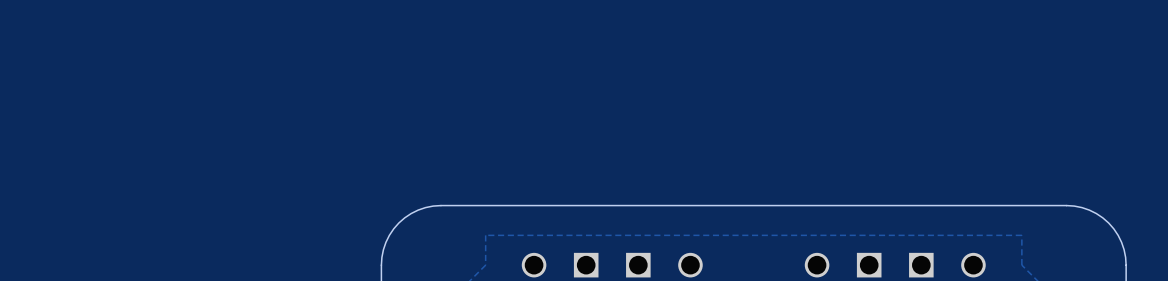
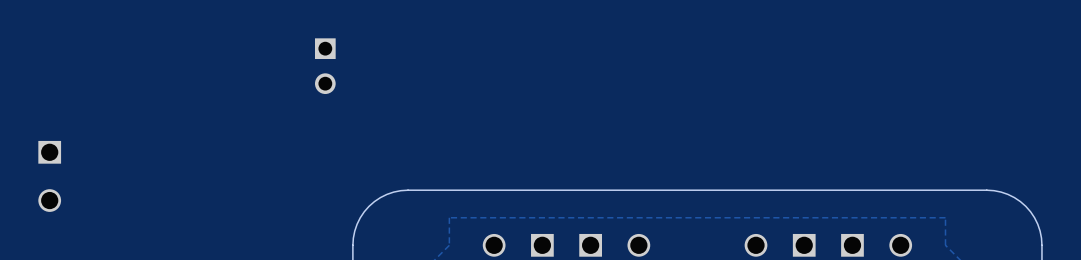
part: none -> (325, 66)
part: none -> (49, 176)

